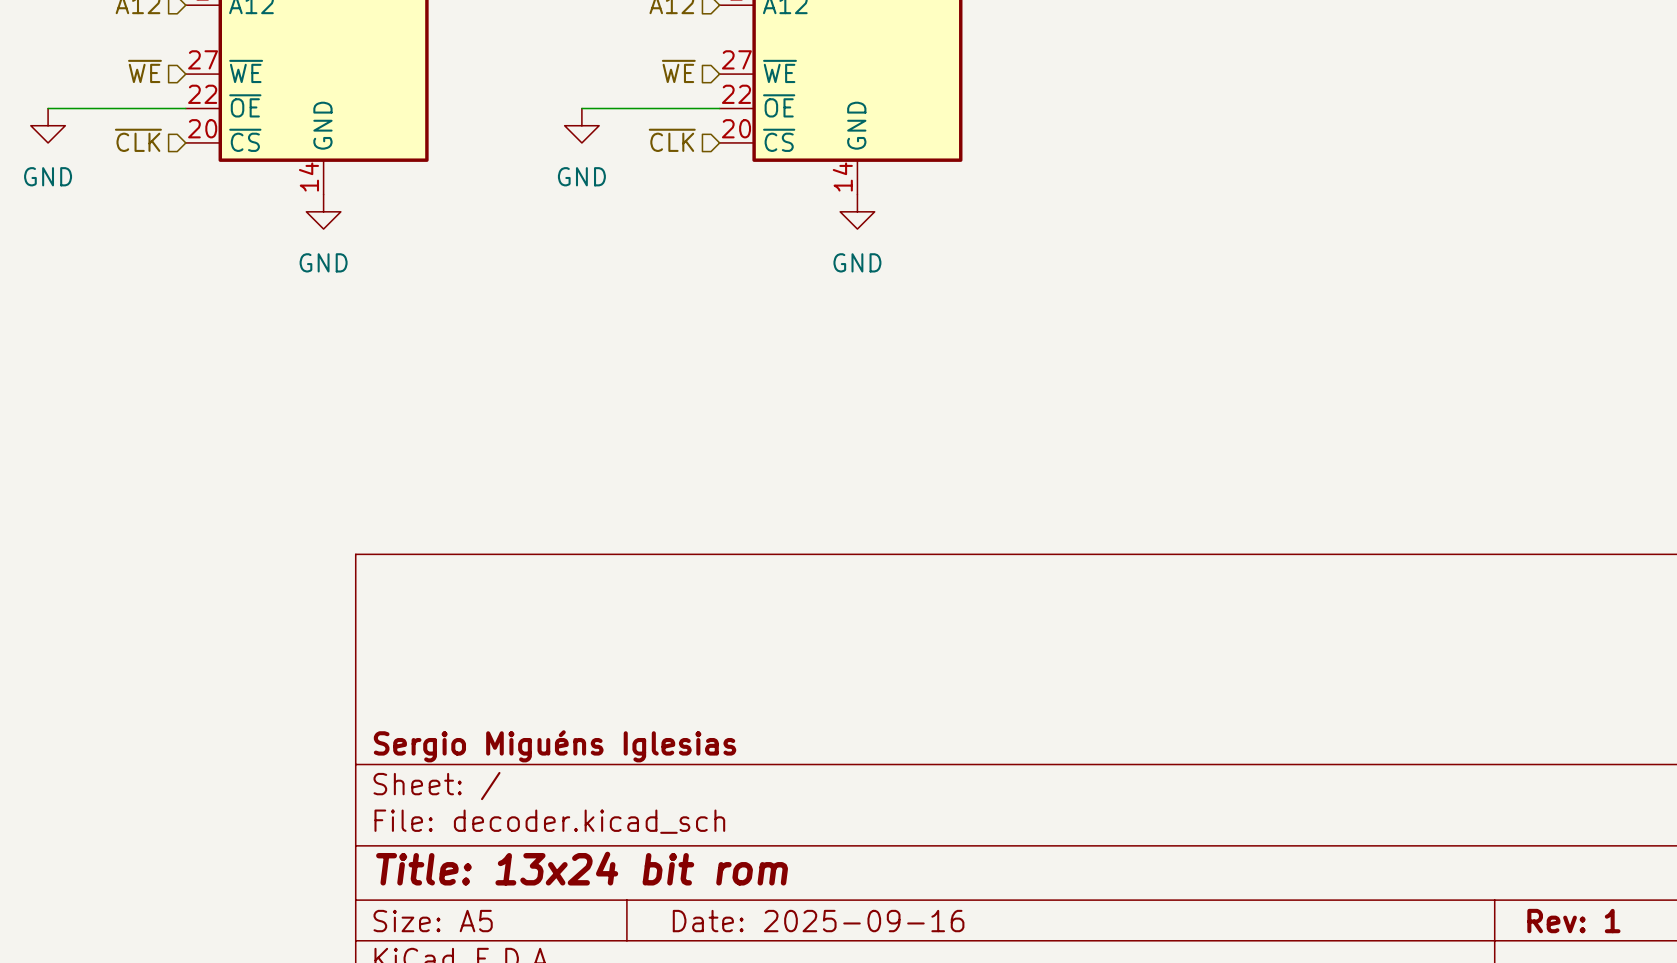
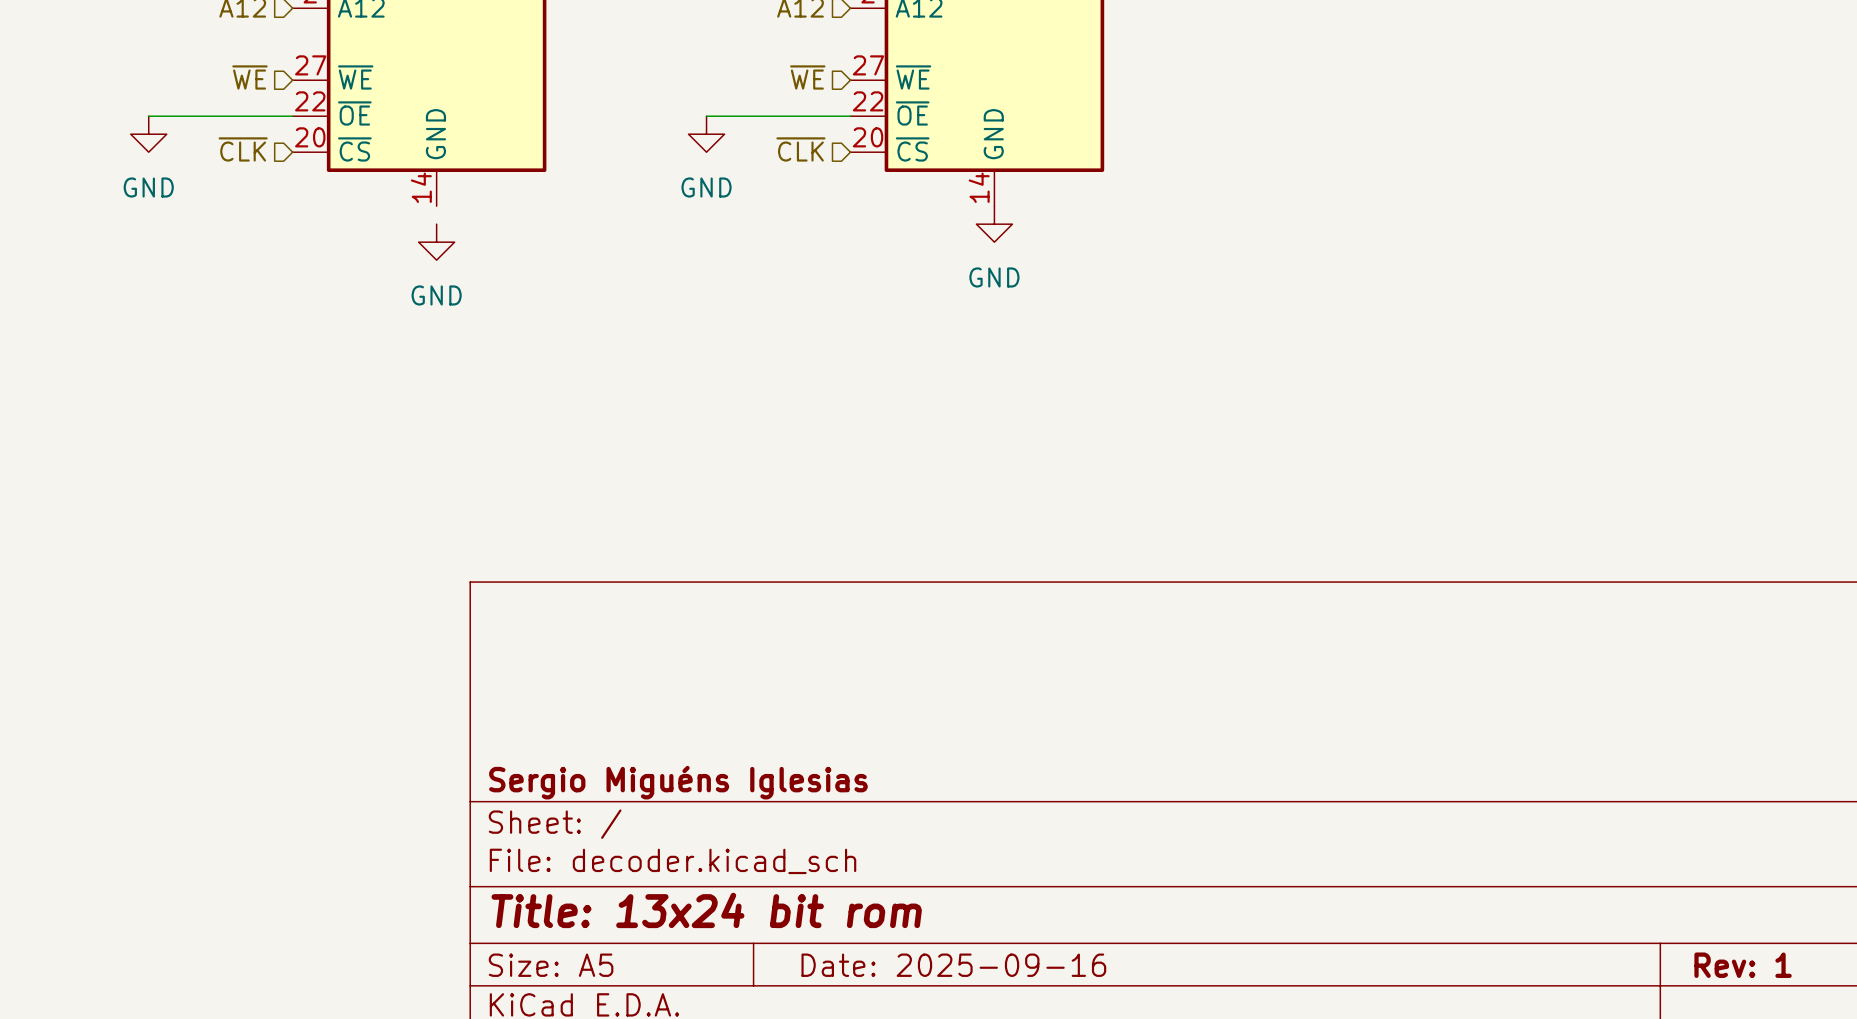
power symbol position: GND (323, 211) -> GND (436, 242)

